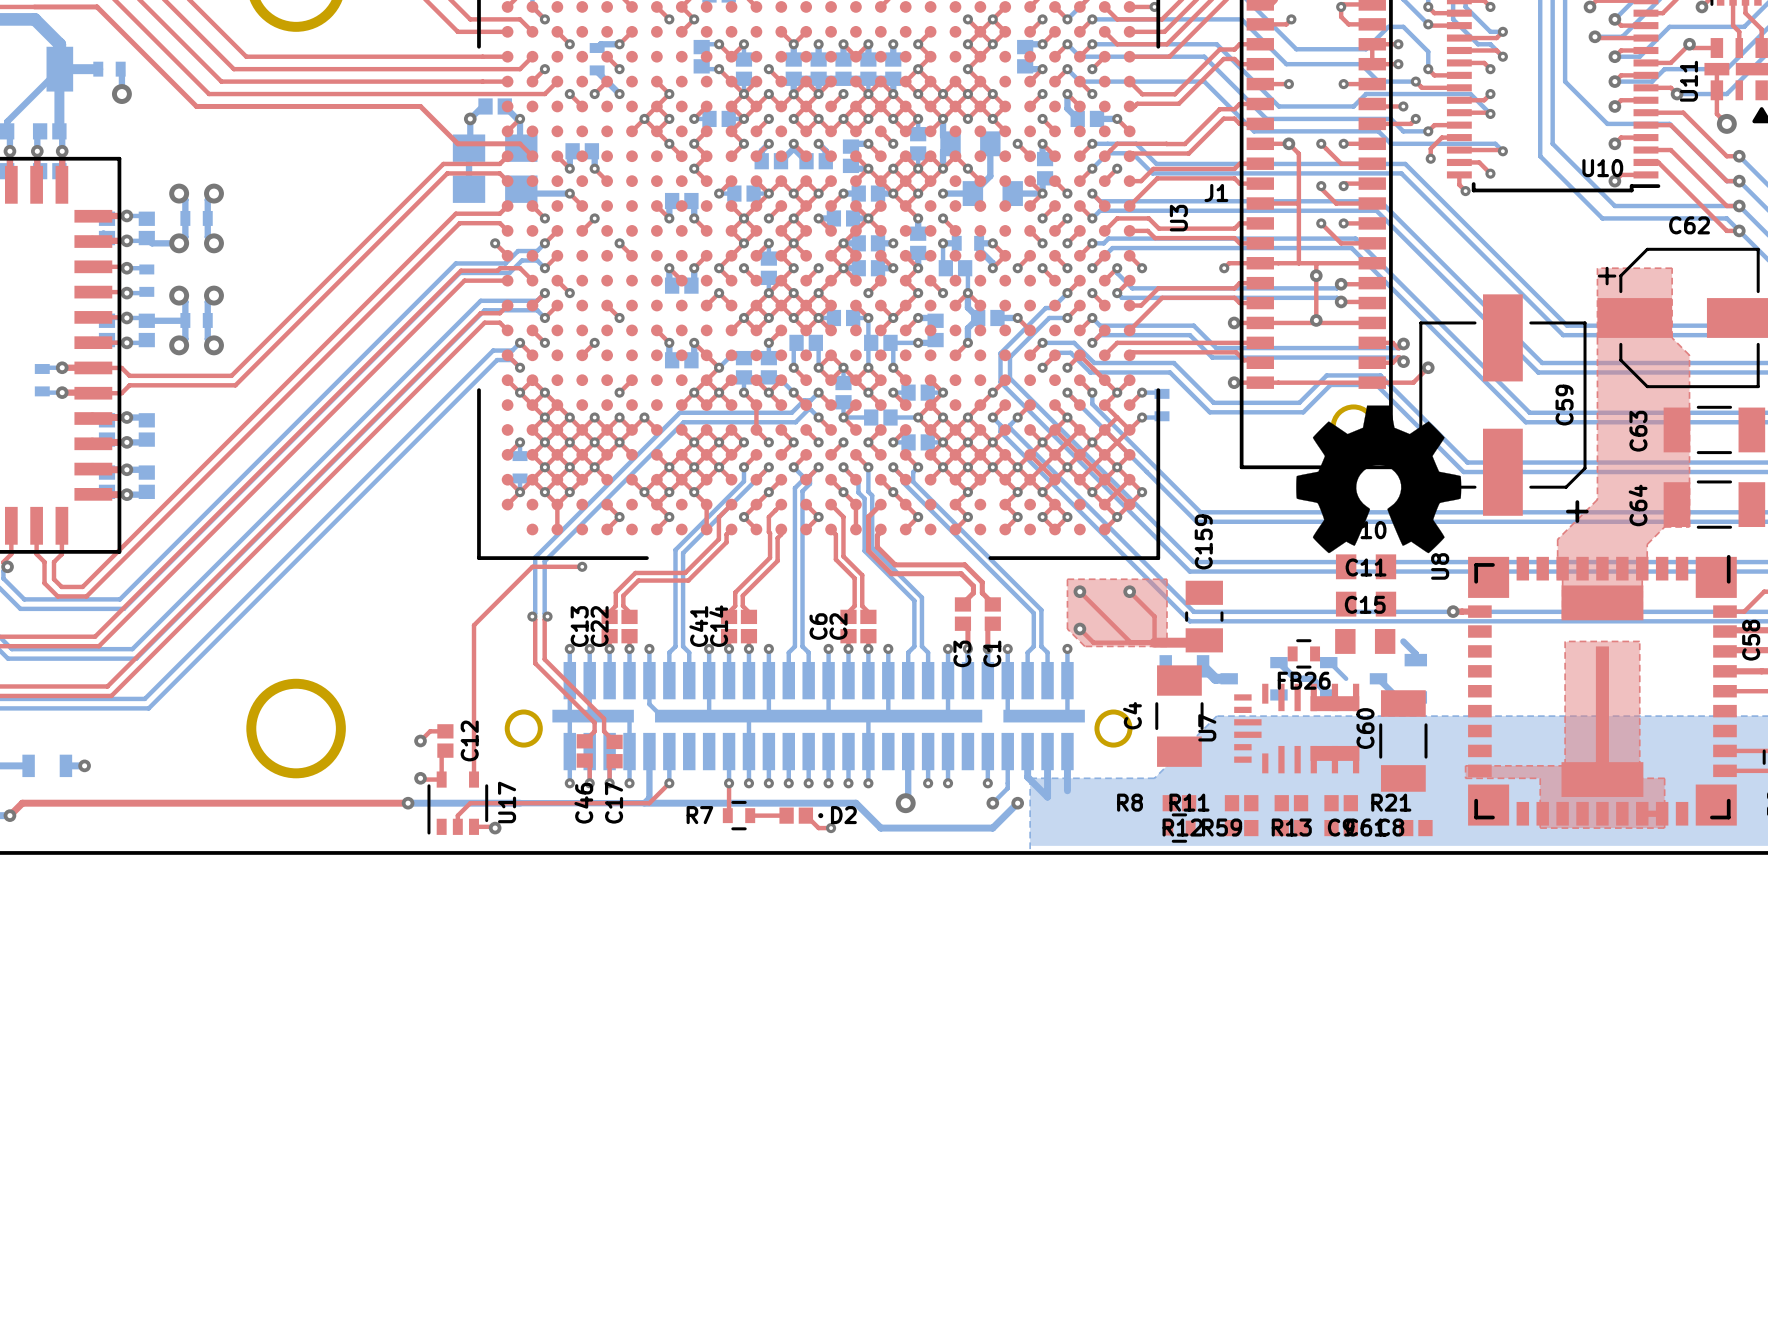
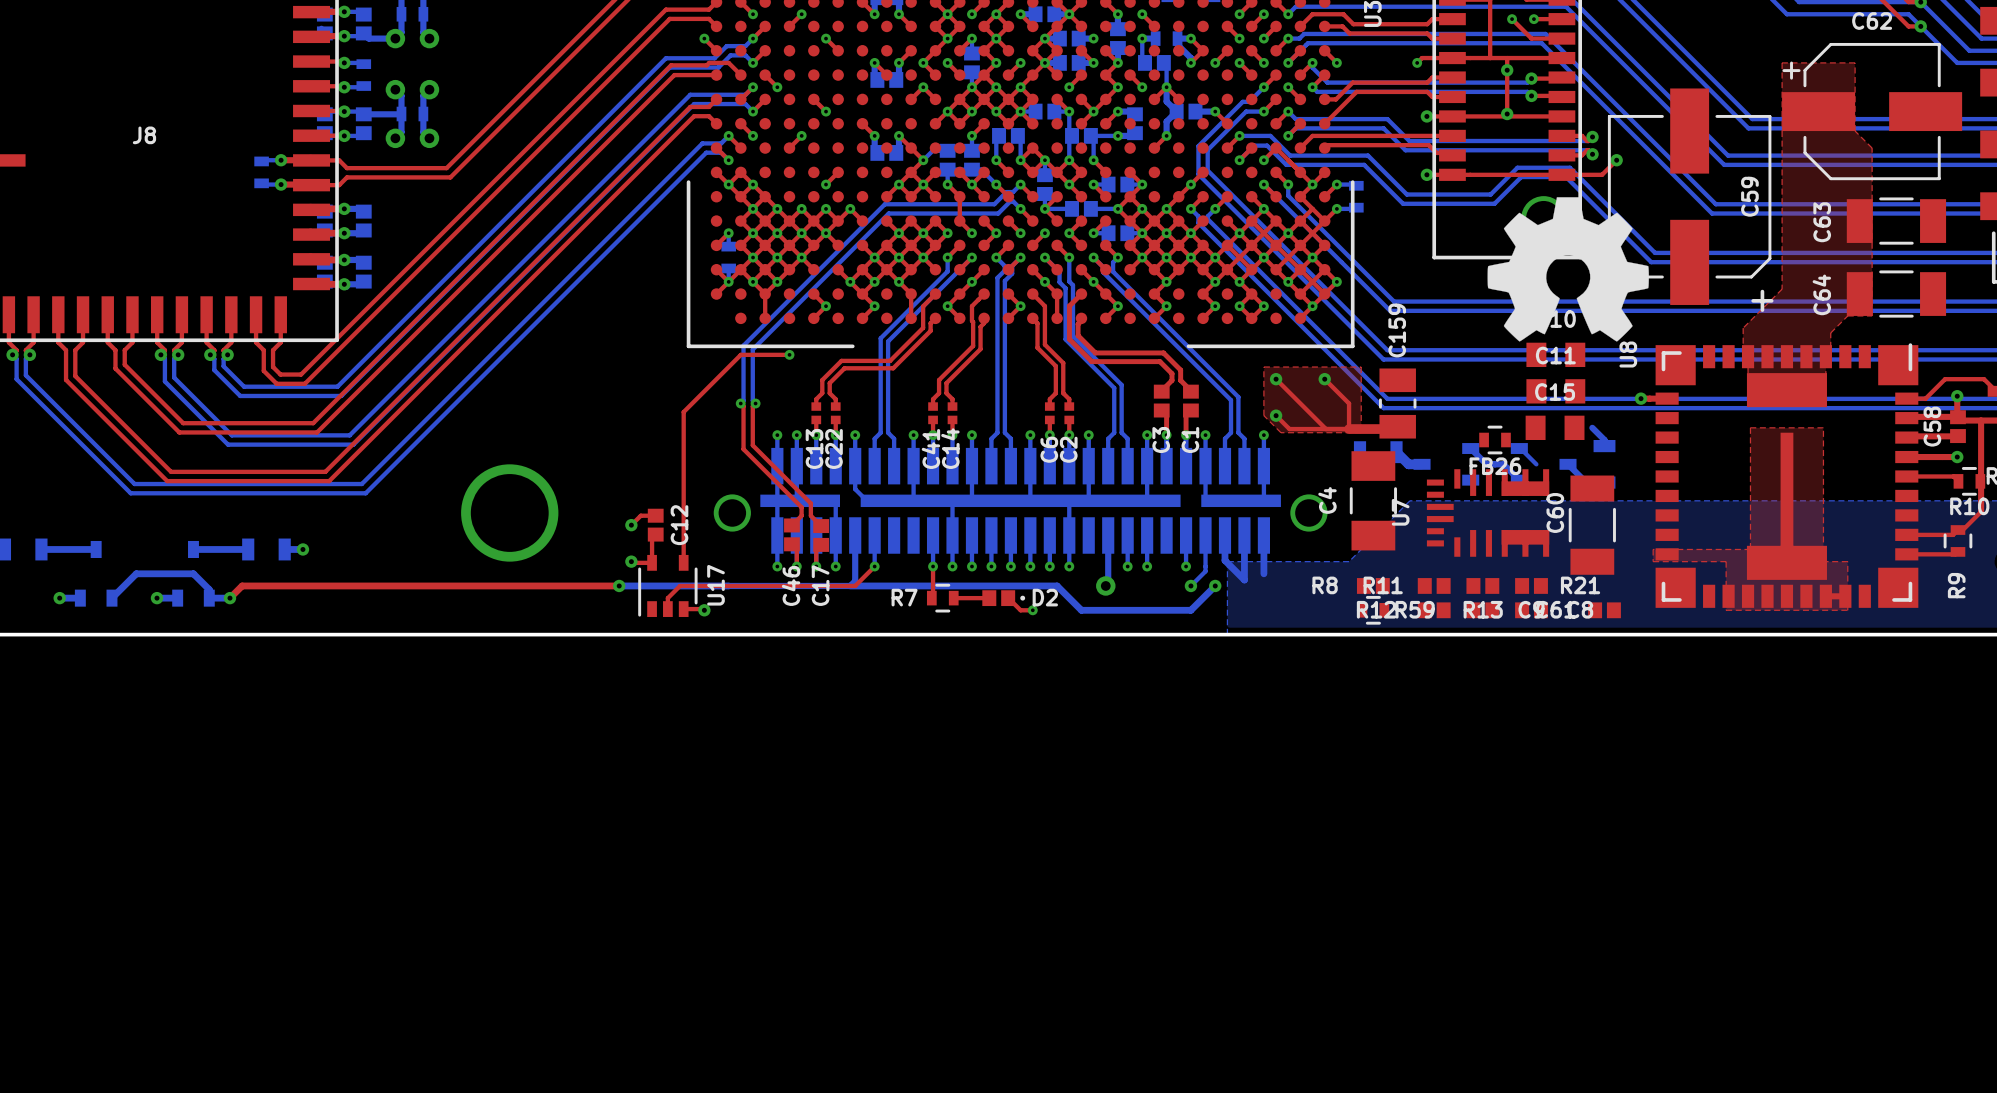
C13 footprint: [601, 609, 618, 644] -> [811, 402, 822, 425]
C22 footprint: [621, 609, 638, 644] -> [830, 402, 841, 425]
C41 footprint: [720, 609, 738, 644] -> [928, 402, 938, 425]
C14 footprint: [740, 609, 758, 644] -> [947, 402, 958, 425]
C6 footprint: [840, 609, 857, 644] -> [1044, 402, 1055, 425]
C2 footprint: [860, 609, 877, 644] -> [1064, 402, 1075, 425]
C13 name position: C13 (579, 626) -> C13 (814, 449)
C22 name position: C22 (599, 626) -> C22 (833, 449)
C41 name position: C41 (698, 626) -> C41 (930, 449)
C14 name position: C14 (718, 626) -> C14 (950, 448)
C6 name position: C6 (818, 626) -> C6 (1049, 449)
C2 name position: C2 (838, 626) -> C2 (1068, 449)

